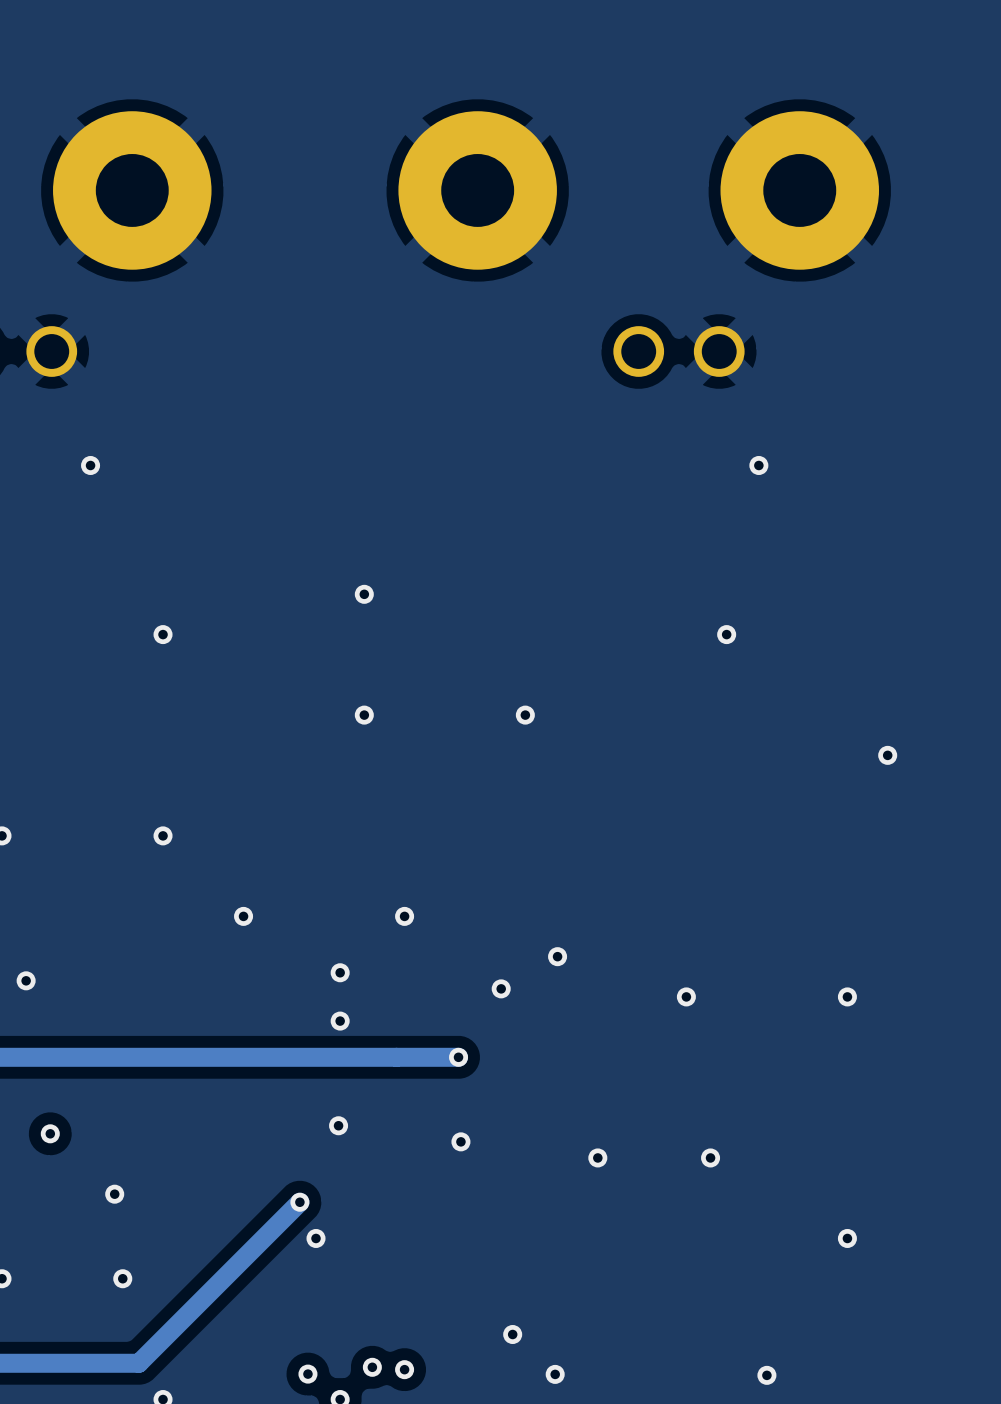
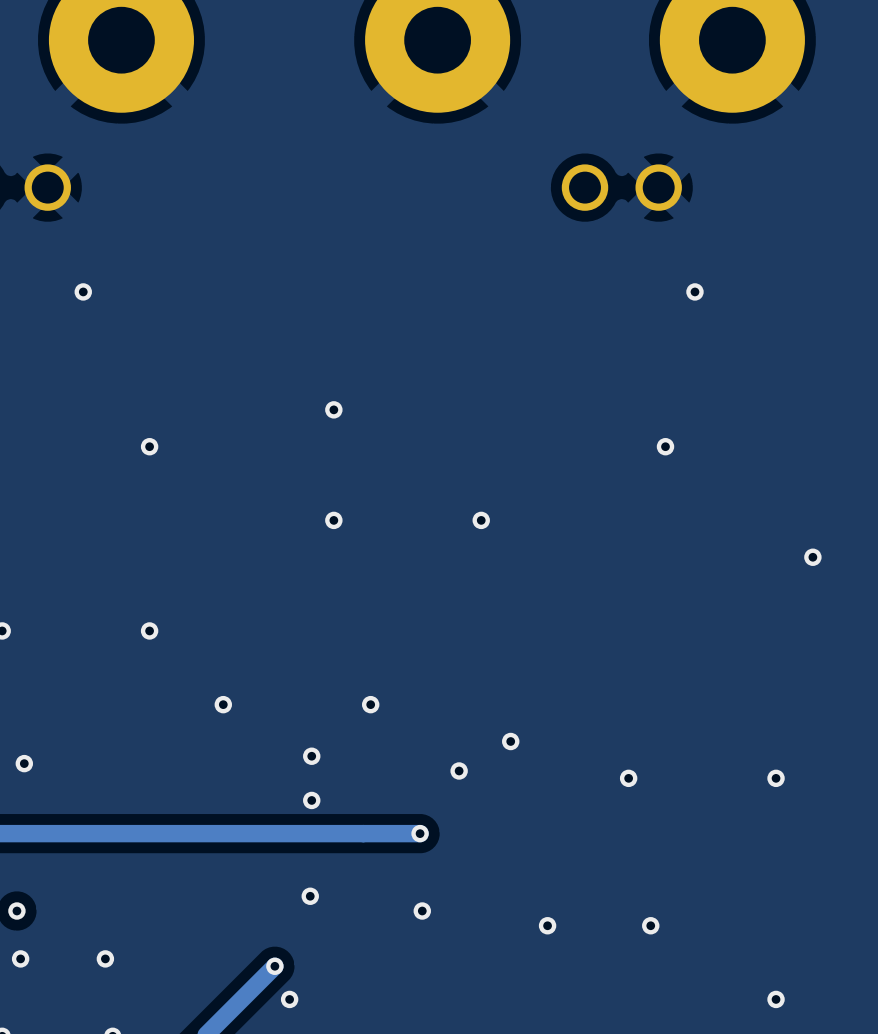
via: (50, 1133) -> none
via: none -> (16, 911)
via: none -> (20, 958)

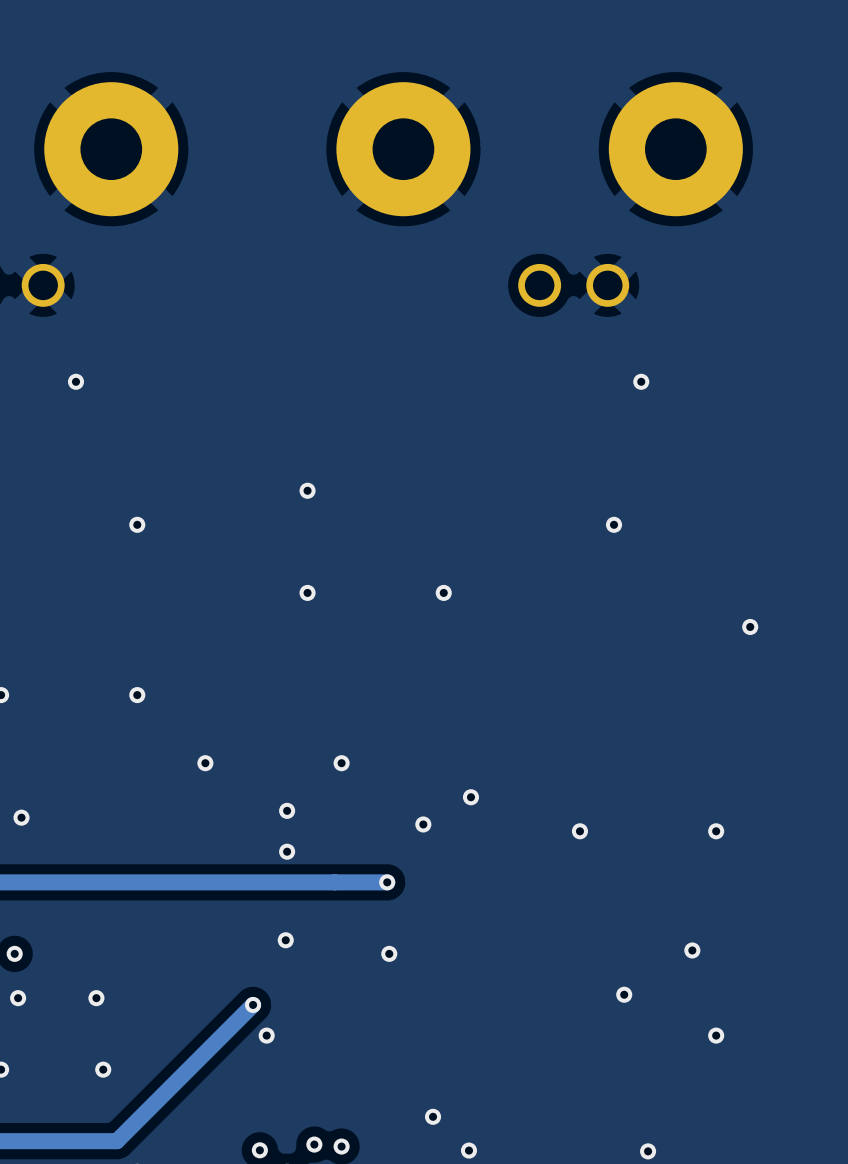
via: none -> (692, 950)
via: (547, 925) -> none
via position: (650, 925) -> (624, 994)

